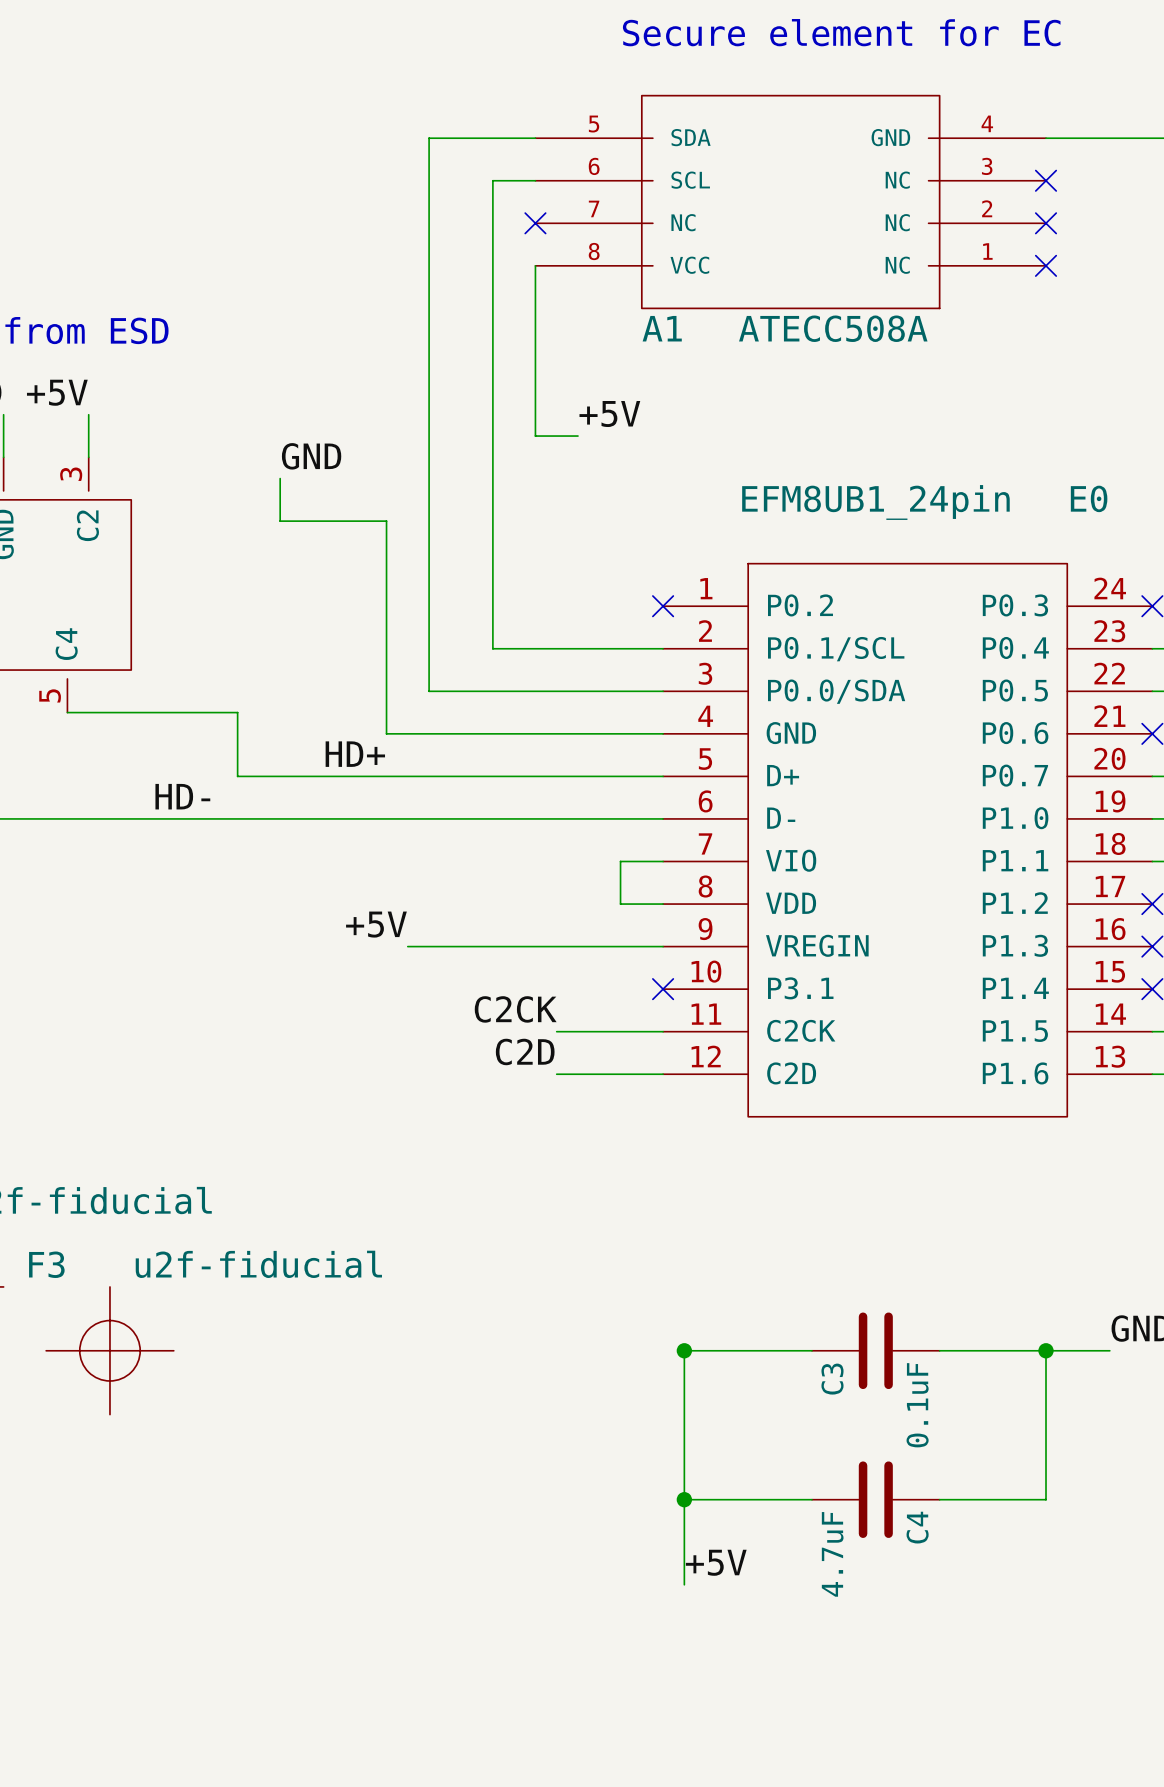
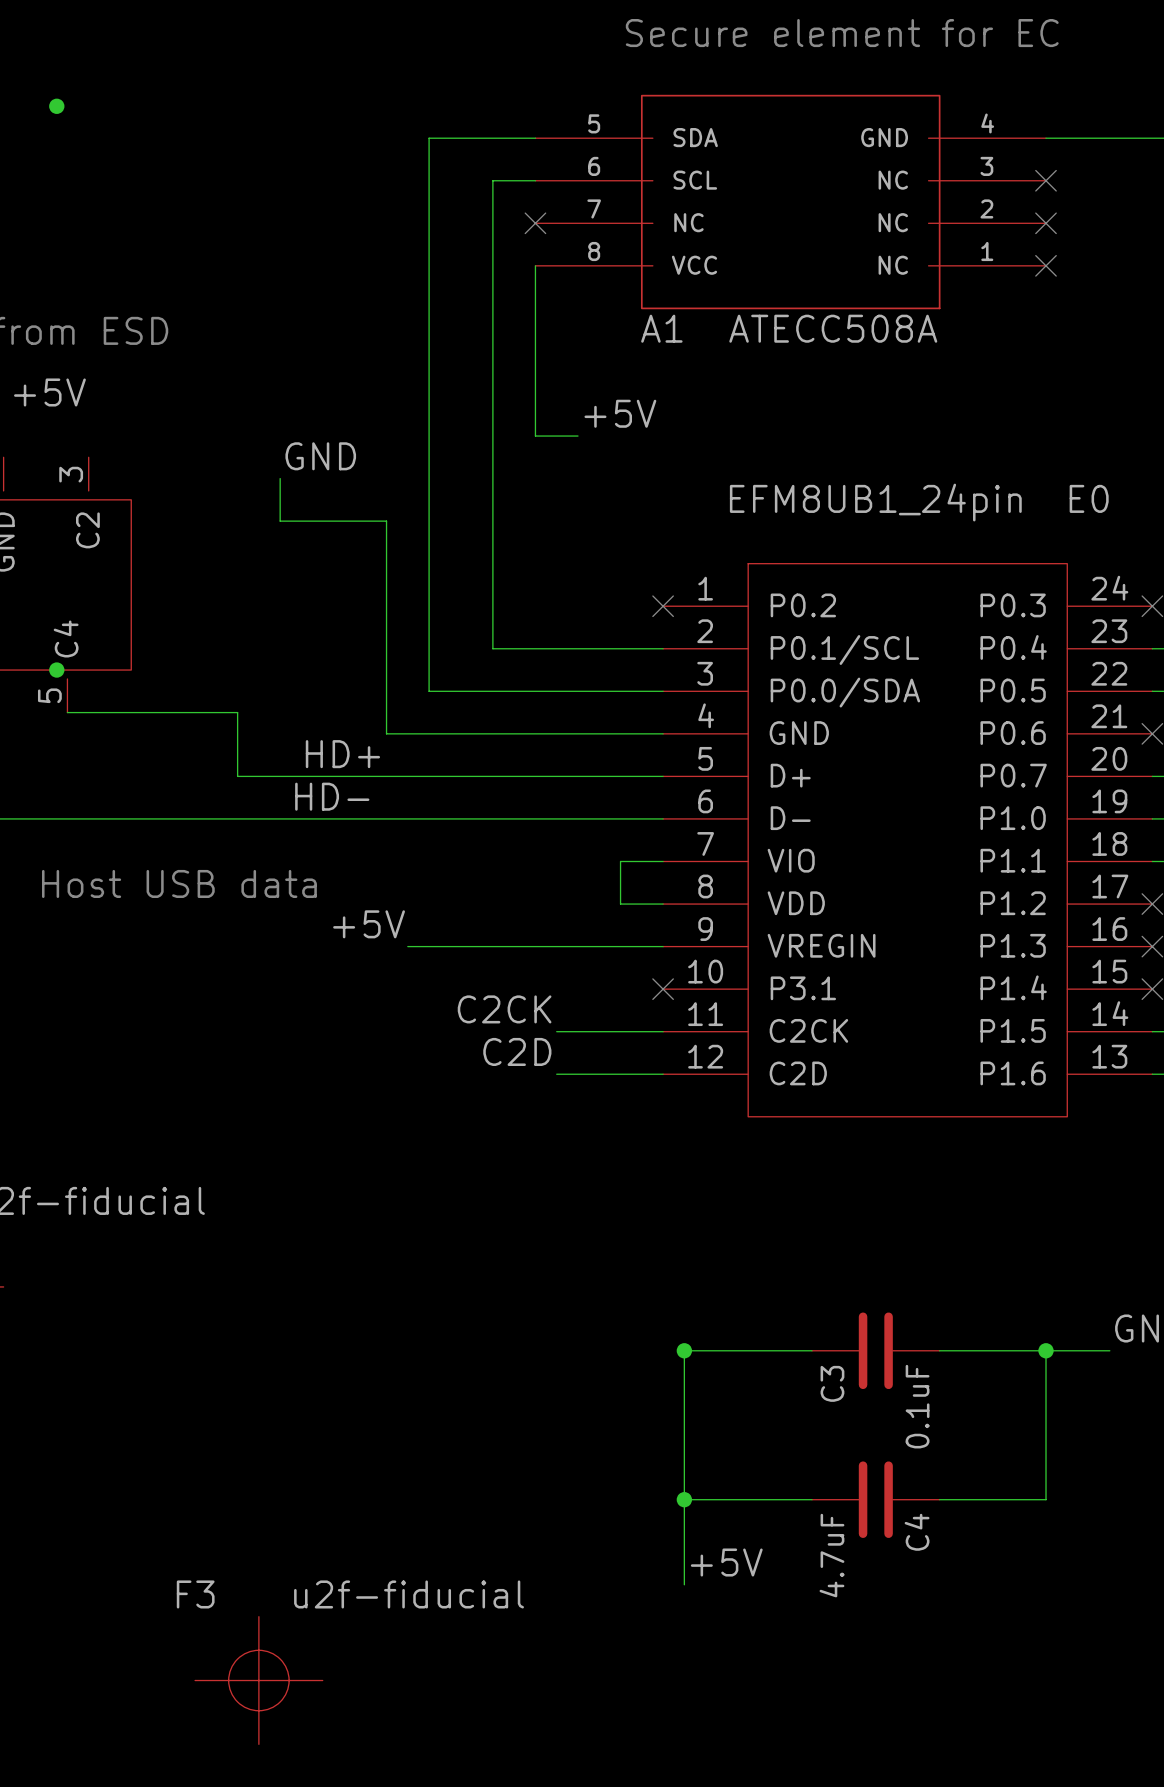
junction: none -> (56, 106)
wire: (3, 414) (3, 457) -> none
wire: (88, 414) (88, 457) -> none
junction: none -> (56, 670)
label position: HD- (182, 796) -> HD- (332, 796)
text: none -> Host USB data (179, 883)
F3 position: (109, 1350) -> (258, 1680)

